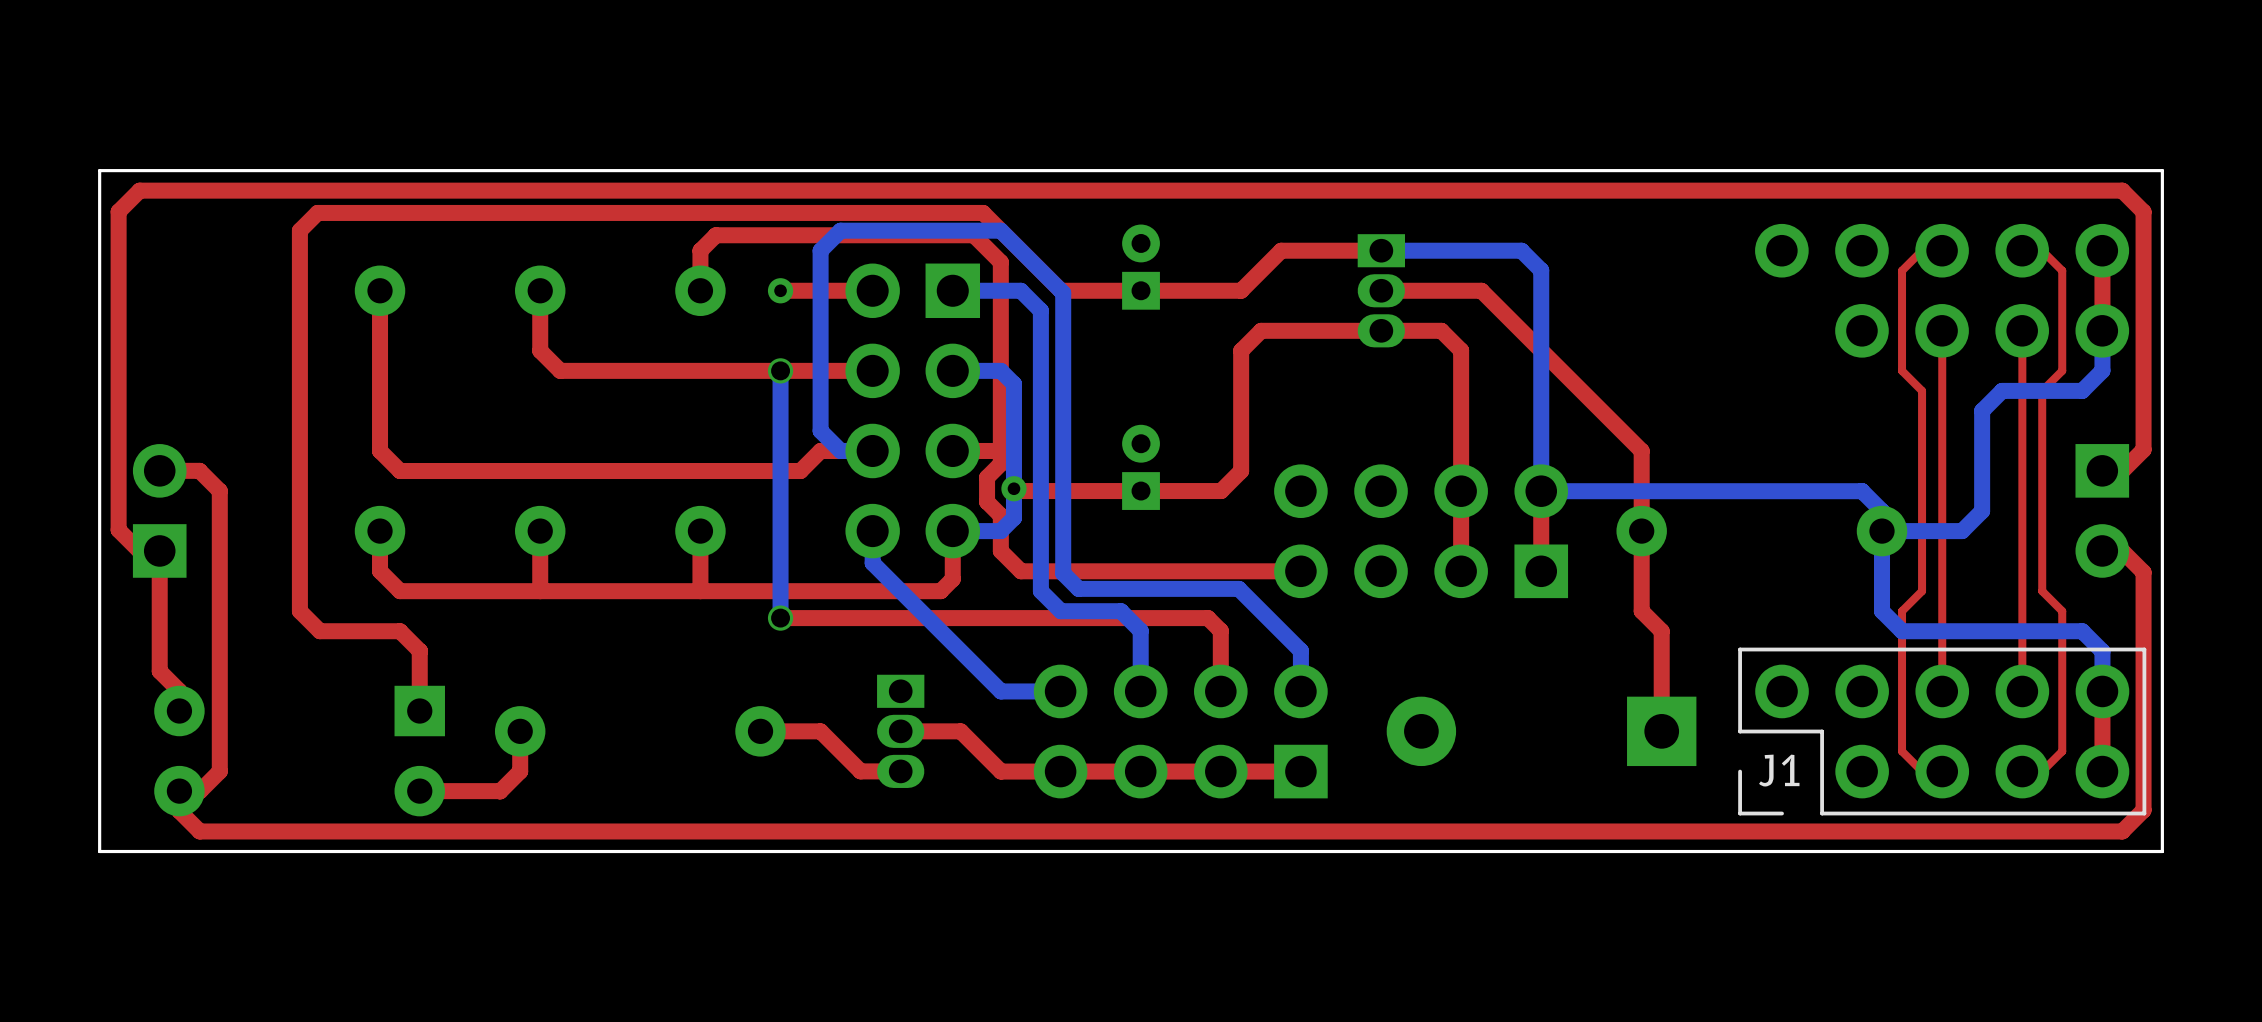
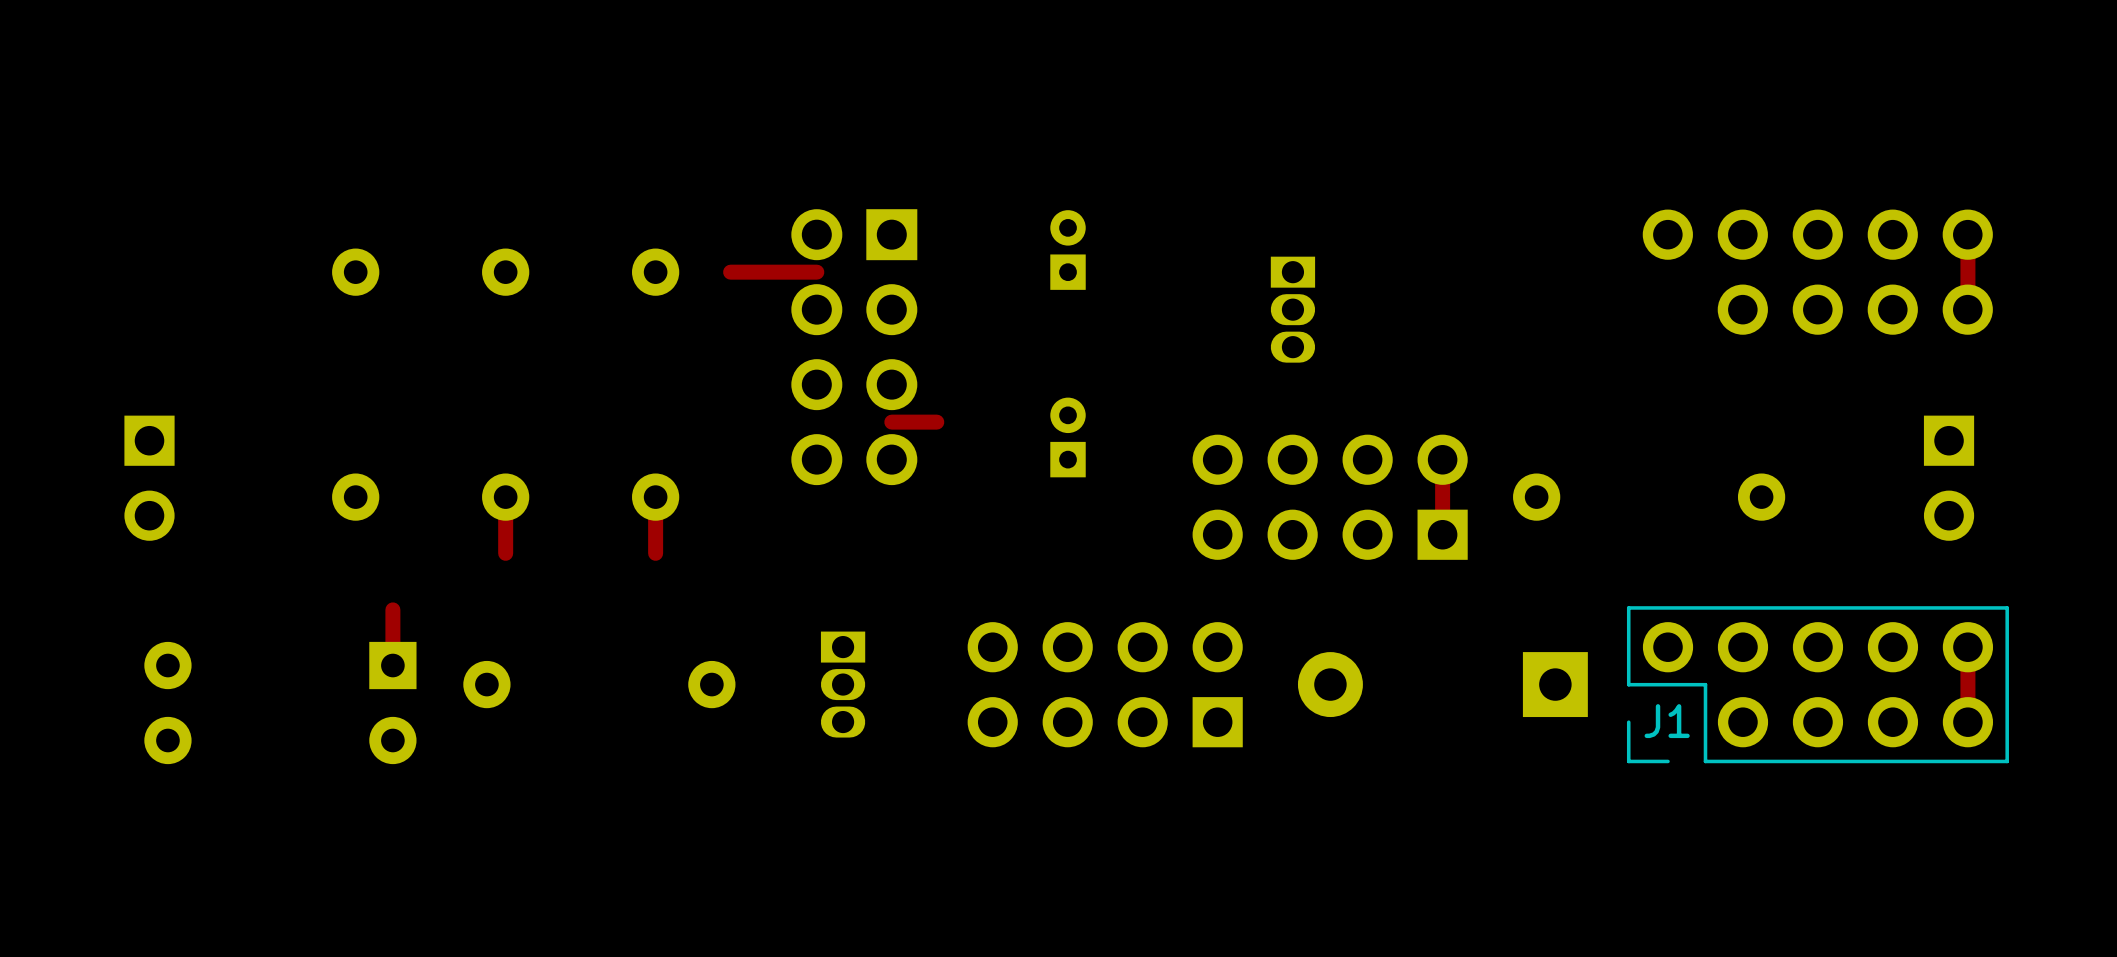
board edge: (2162, 170) (99, 170) (99, 851) (2162, 851) (2162, 170) -> none
top track: (1381, 250) (1281, 250) (1241, 290) (1060, 290) (983, 212) (317, 212) (299, 230) (299, 611) (319, 631) (400, 631) (420, 651) -> none
bottom track: (1381, 250) (1521, 250) (1541, 270) (1541, 491) (1861, 491) -> none
top track: (1942, 250) (1922, 250) (1902, 270) (1902, 370) (1922, 390) (1922, 591) (1902, 611) (1902, 751) (1922, 771) (1942, 771) -> none
top track: (2022, 250) (2042, 250) (2062, 270) (2062, 370) (2042, 390) (2042, 591) (2062, 611) (2062, 751) (2042, 771) (2022, 771) -> none
top track: (380, 290) (380, 450) (400, 471) (800, 471) (820, 450) (872, 450) -> none
top track: (540, 290) (540, 350) (560, 370) (872, 370) -> none
top track: (700, 290) (700, 250) (715, 235) (973, 235) (1000, 262) (1000, 463) (987, 477) (987, 501) (1000, 515) (1000, 551) (1021, 571) (1300, 571) -> none
via: (780, 290) -> none
bottom track: (952, 290) (1020, 290) (1040, 310) (1040, 591) (1060, 611) (1121, 611) (1140, 630) (1140, 691) -> none
top track: (1381, 290) (1481, 290) (1641, 450) (1641, 611) (1661, 631) (1661, 731) -> none
part position: (1381, 290) -> (1292, 309)
top track: (1942, 330) (1942, 691) -> none
top track: (2022, 330) (2022, 691) -> none
bottom track: (2102, 330) (2102, 370) (2082, 390) (2002, 390) (1982, 410) (1982, 511) (1962, 531) (1882, 531) -> none
bottom track: (780, 370) (780, 618) -> none
via: (780, 370) -> none
bottom track: (952, 370) (1000, 370) (1013, 384) (1013, 517) (1000, 531) (952, 531) -> none
part position: (912, 410) -> (854, 347)
bottom track: (872, 450) (840, 450) (820, 430) (820, 250) (840, 230) (1000, 230) (1063, 293) (1063, 573) (1078, 588) (1238, 588) (1300, 650) (1300, 691) -> none
top track: (159, 470) (199, 470) (219, 491) (219, 771) (200, 791) (179, 791) (179, 811) (199, 831) (2122, 831) (2143, 810) (2143, 572) (2122, 550) (2102, 550) -> none
top track: (2102, 470) (2122, 470) (2143, 449) (2143, 211) (2122, 190) (139, 190) (118, 211) (118, 530) (139, 550) (159, 550) (159, 671) (179, 690) (179, 711) -> none
top track: (1013, 488) (1016, 491) (1221, 491) (1241, 471) (1241, 350) (1261, 330) (1441, 330) (1461, 350) (1461, 571) -> none
via: (1013, 488) -> none
bottom track: (1861, 491) (1882, 511) (1882, 611) (1902, 631) (2082, 631) (2102, 651) (2102, 691) -> none
part rotation: 0° (159, 510) -> 180° (149, 478)
part position: (2102, 510) -> (1949, 478)
bottom track: (872, 531) (872, 563) (1000, 691) (1060, 691) -> none
top track: (952, 531) (952, 579) (940, 591) (400, 591) (380, 571) (380, 531) -> none
top track: (780, 618) (1207, 618) (1220, 630) (1220, 691) -> none
via: (780, 618) -> none
top track: (520, 731) (520, 771) (500, 791) -> none
top track: (760, 731) (820, 731) (860, 771) (900, 771) -> none
top track: (900, 731) (960, 731) (1000, 771) (1300, 771) -> none
top track: (499, 791) (419, 791) -> none

